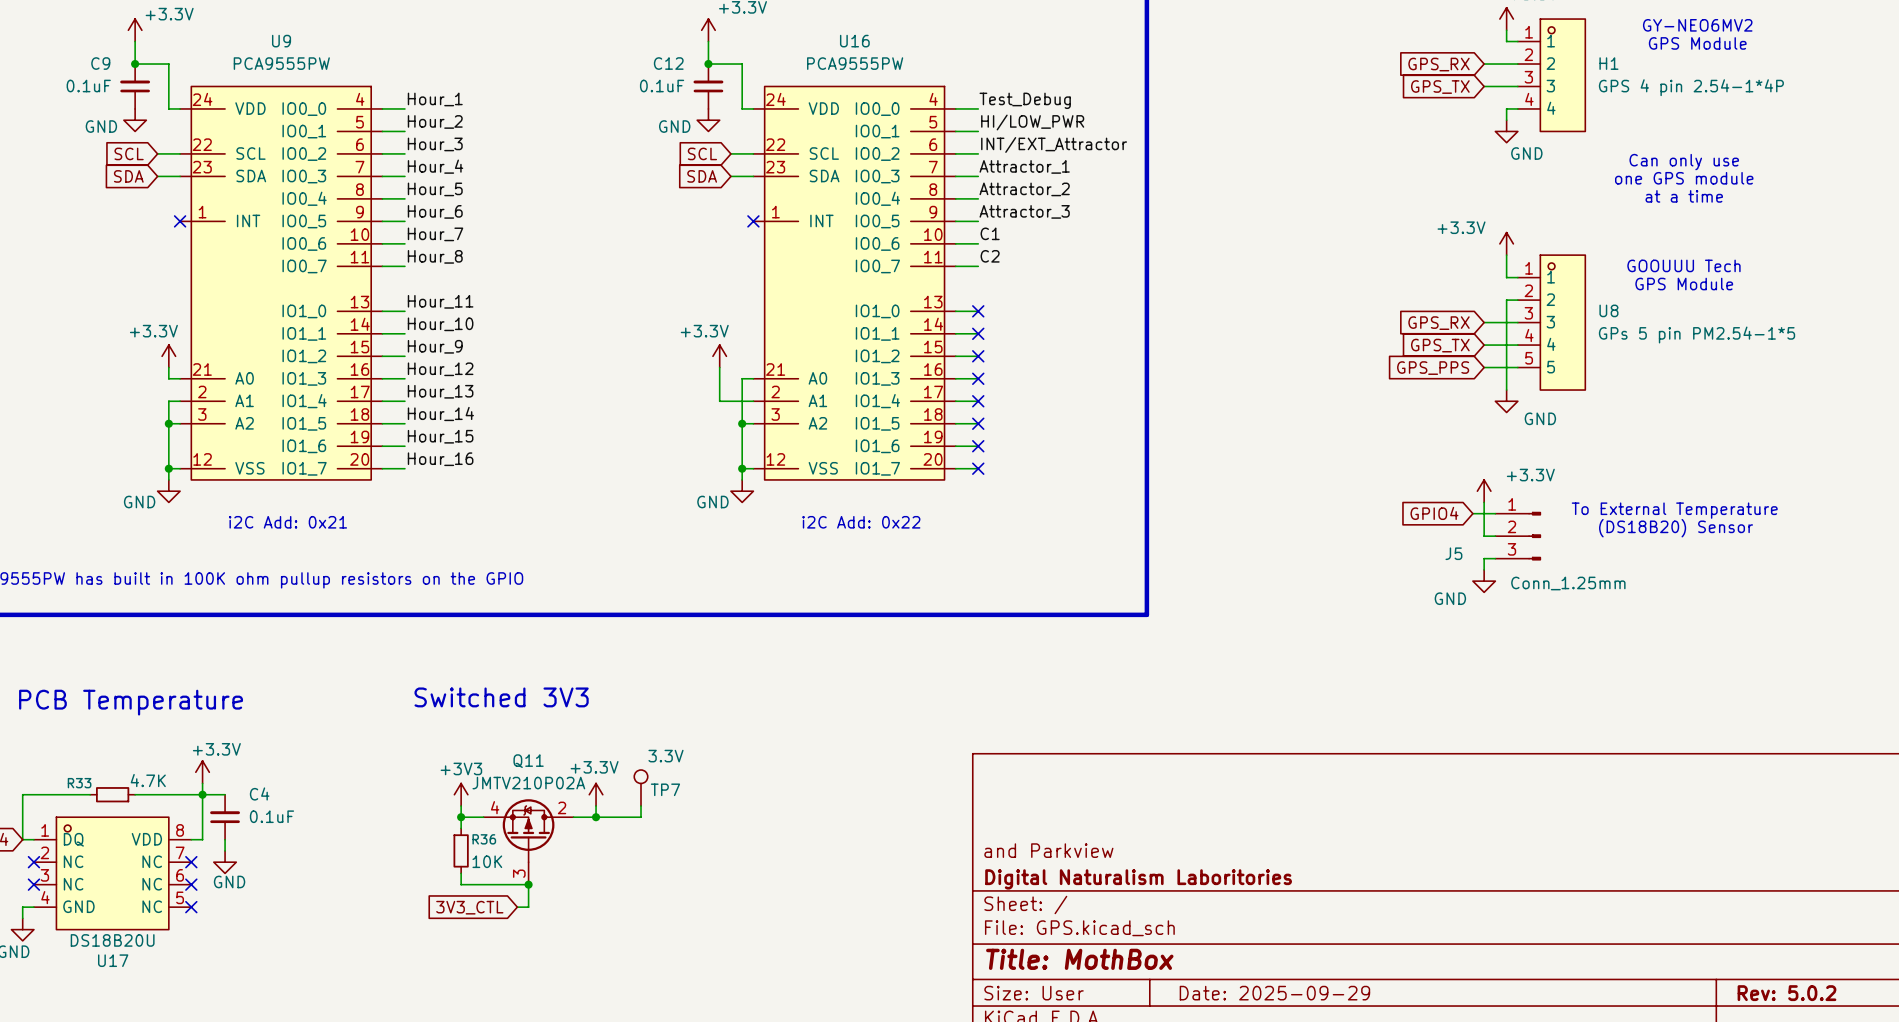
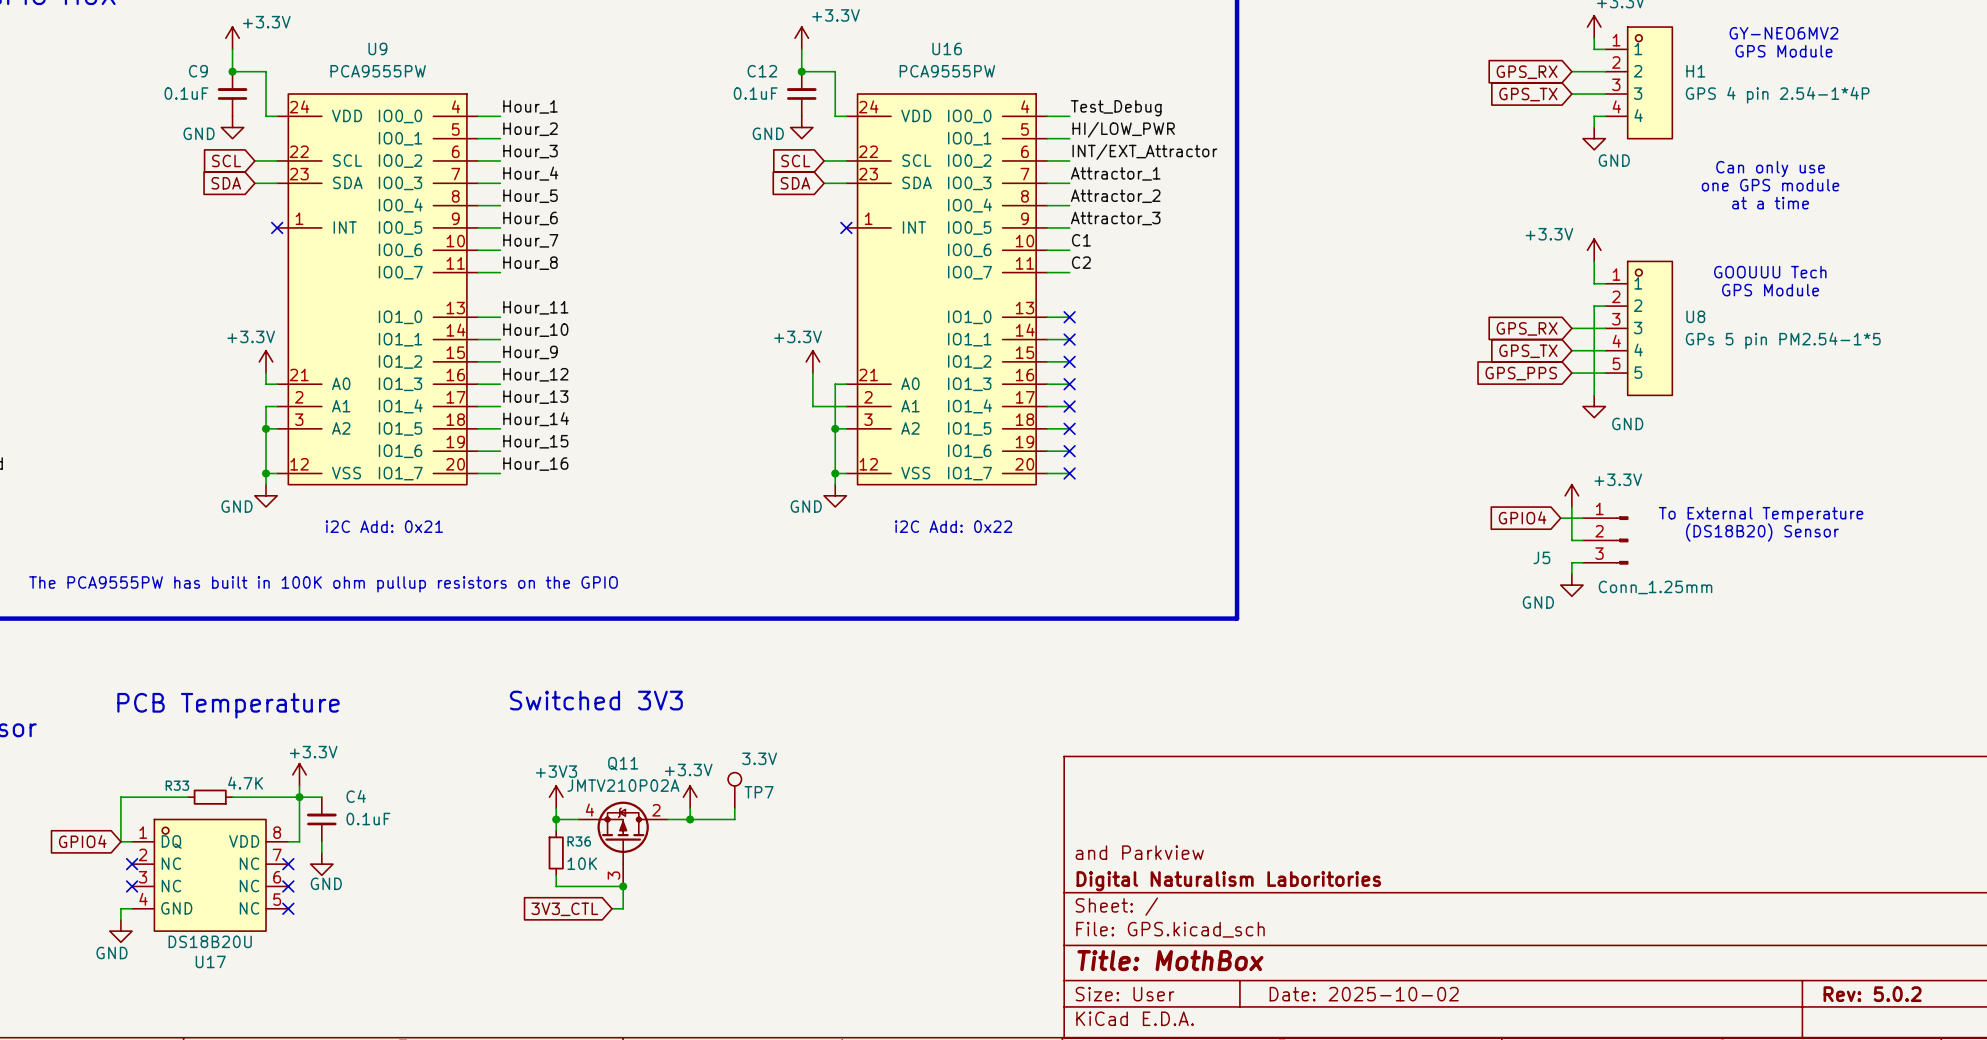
title block: Date: 2025-09-29 (1274, 993) -> Date: 2025-10-02 (1364, 994)

